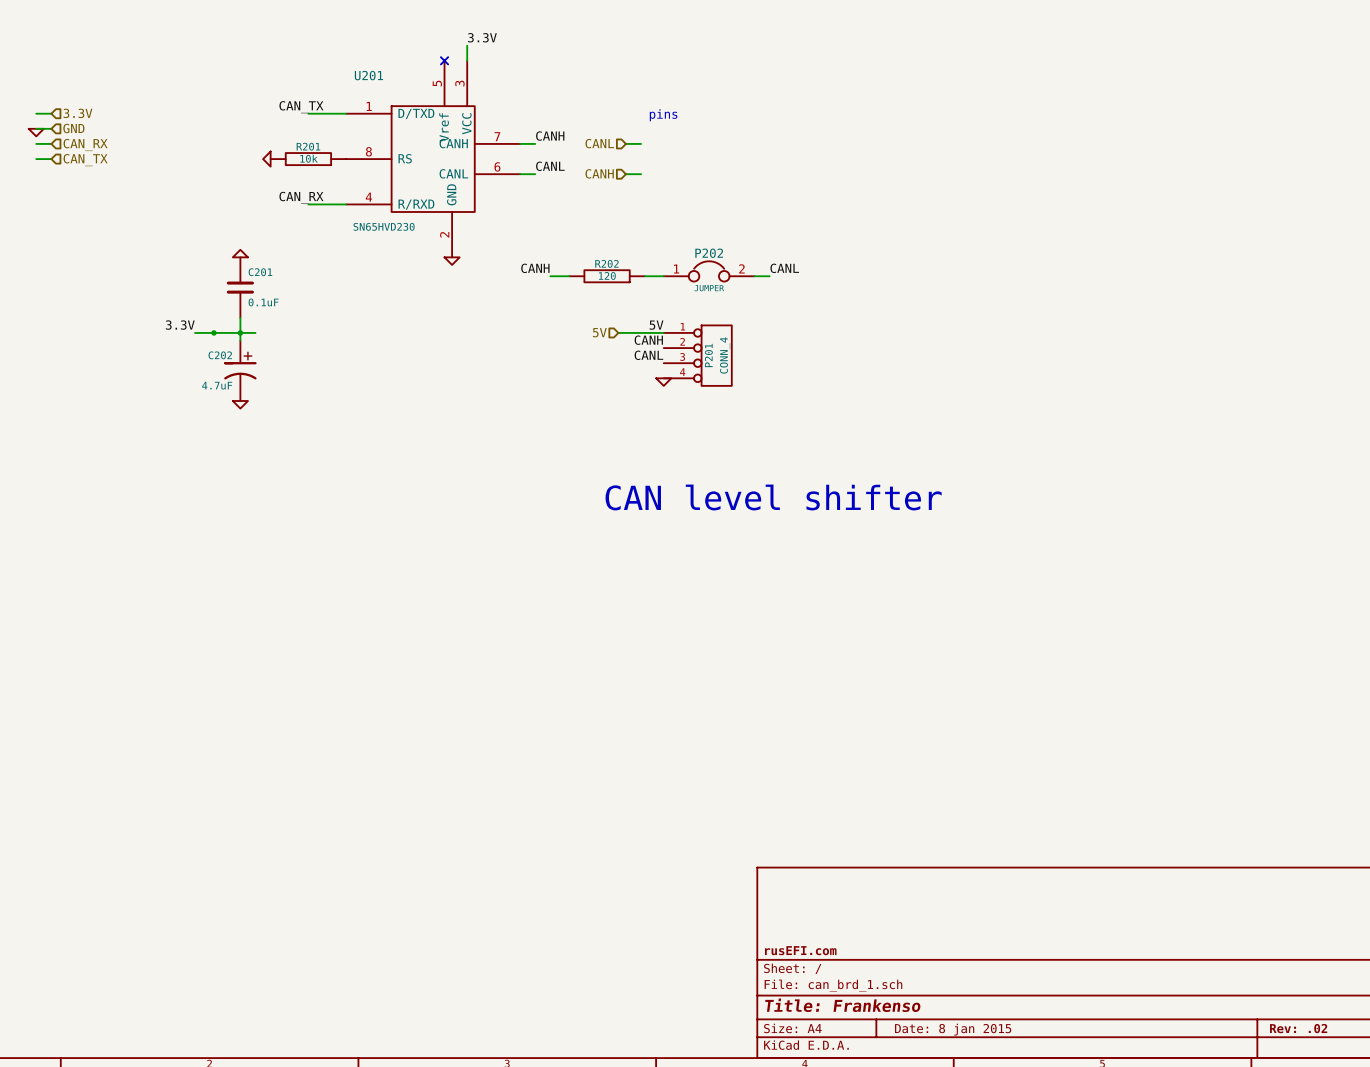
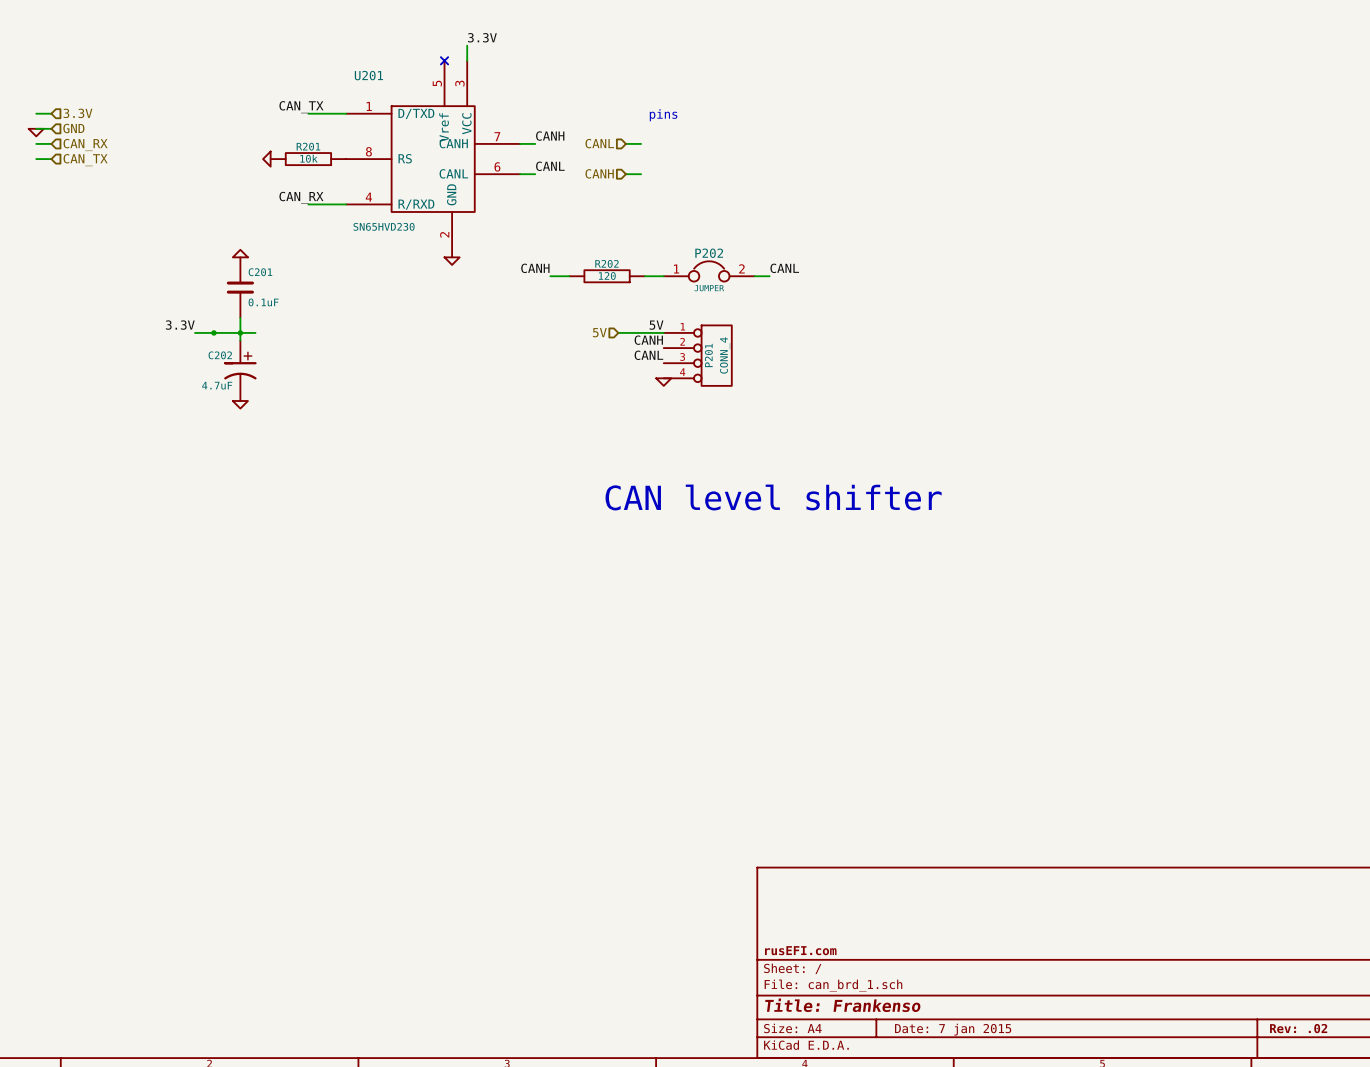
title block: Date: 8 jan 2015 (953, 1029) -> Date: 7 jan 2015 (953, 1029)

